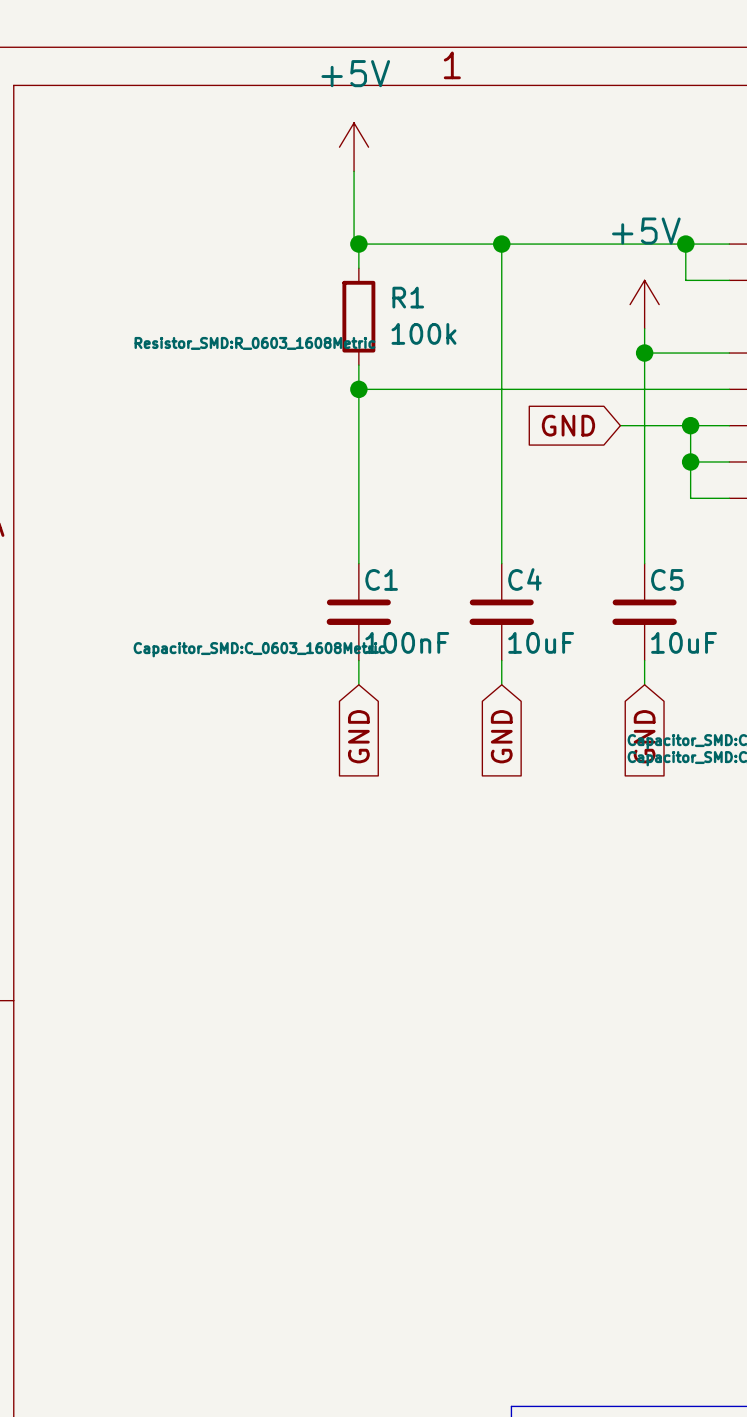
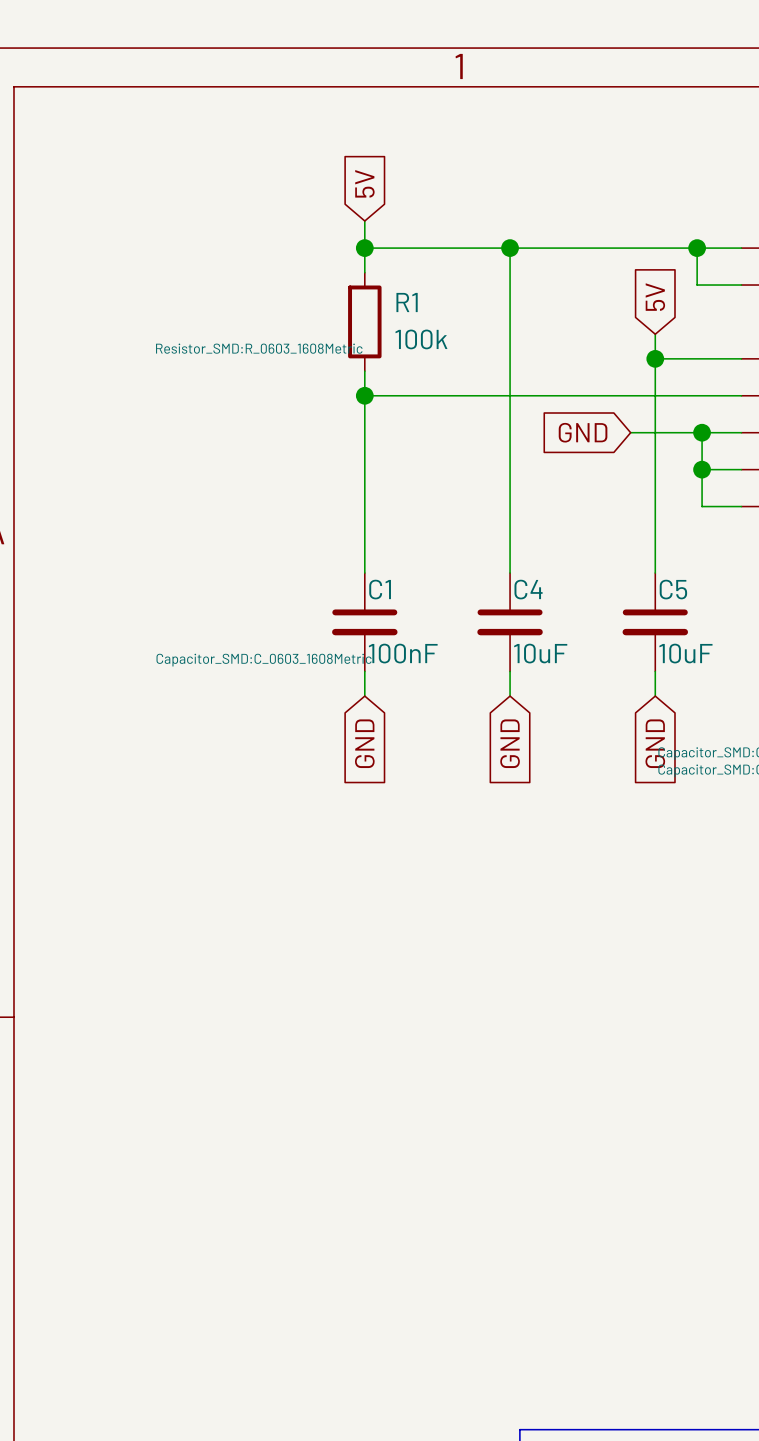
power symbol: +5V (354, 147) -> none
wire: (354, 171) (354, 244) (358, 244) -> (364, 221) (364, 248)
global label: none -> 5V (364, 183)
global label: none -> 5V (655, 297)
power symbol: +5V (644, 304) -> none

